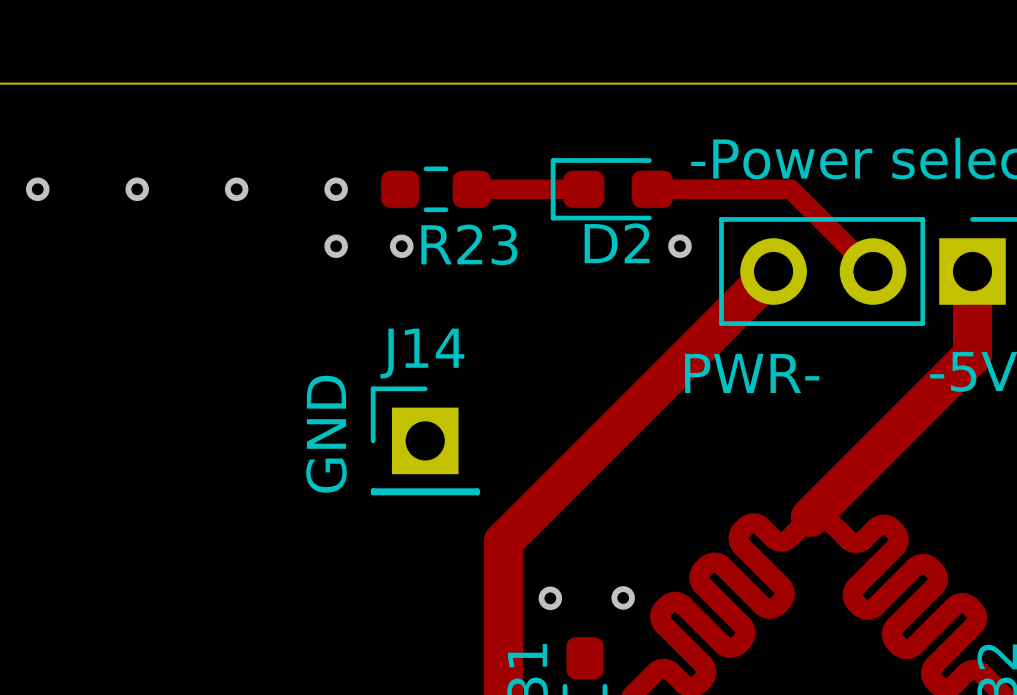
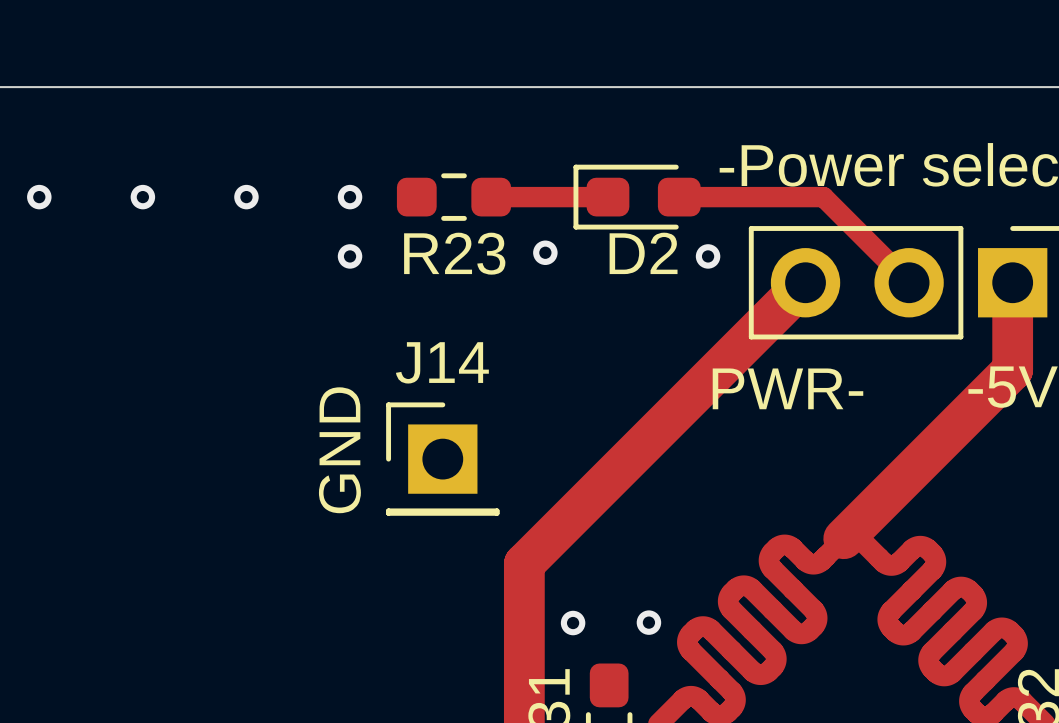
R23 name position: R23 (469, 244) -> R23 (454, 253)
via position: (401, 246) -> (545, 252)

